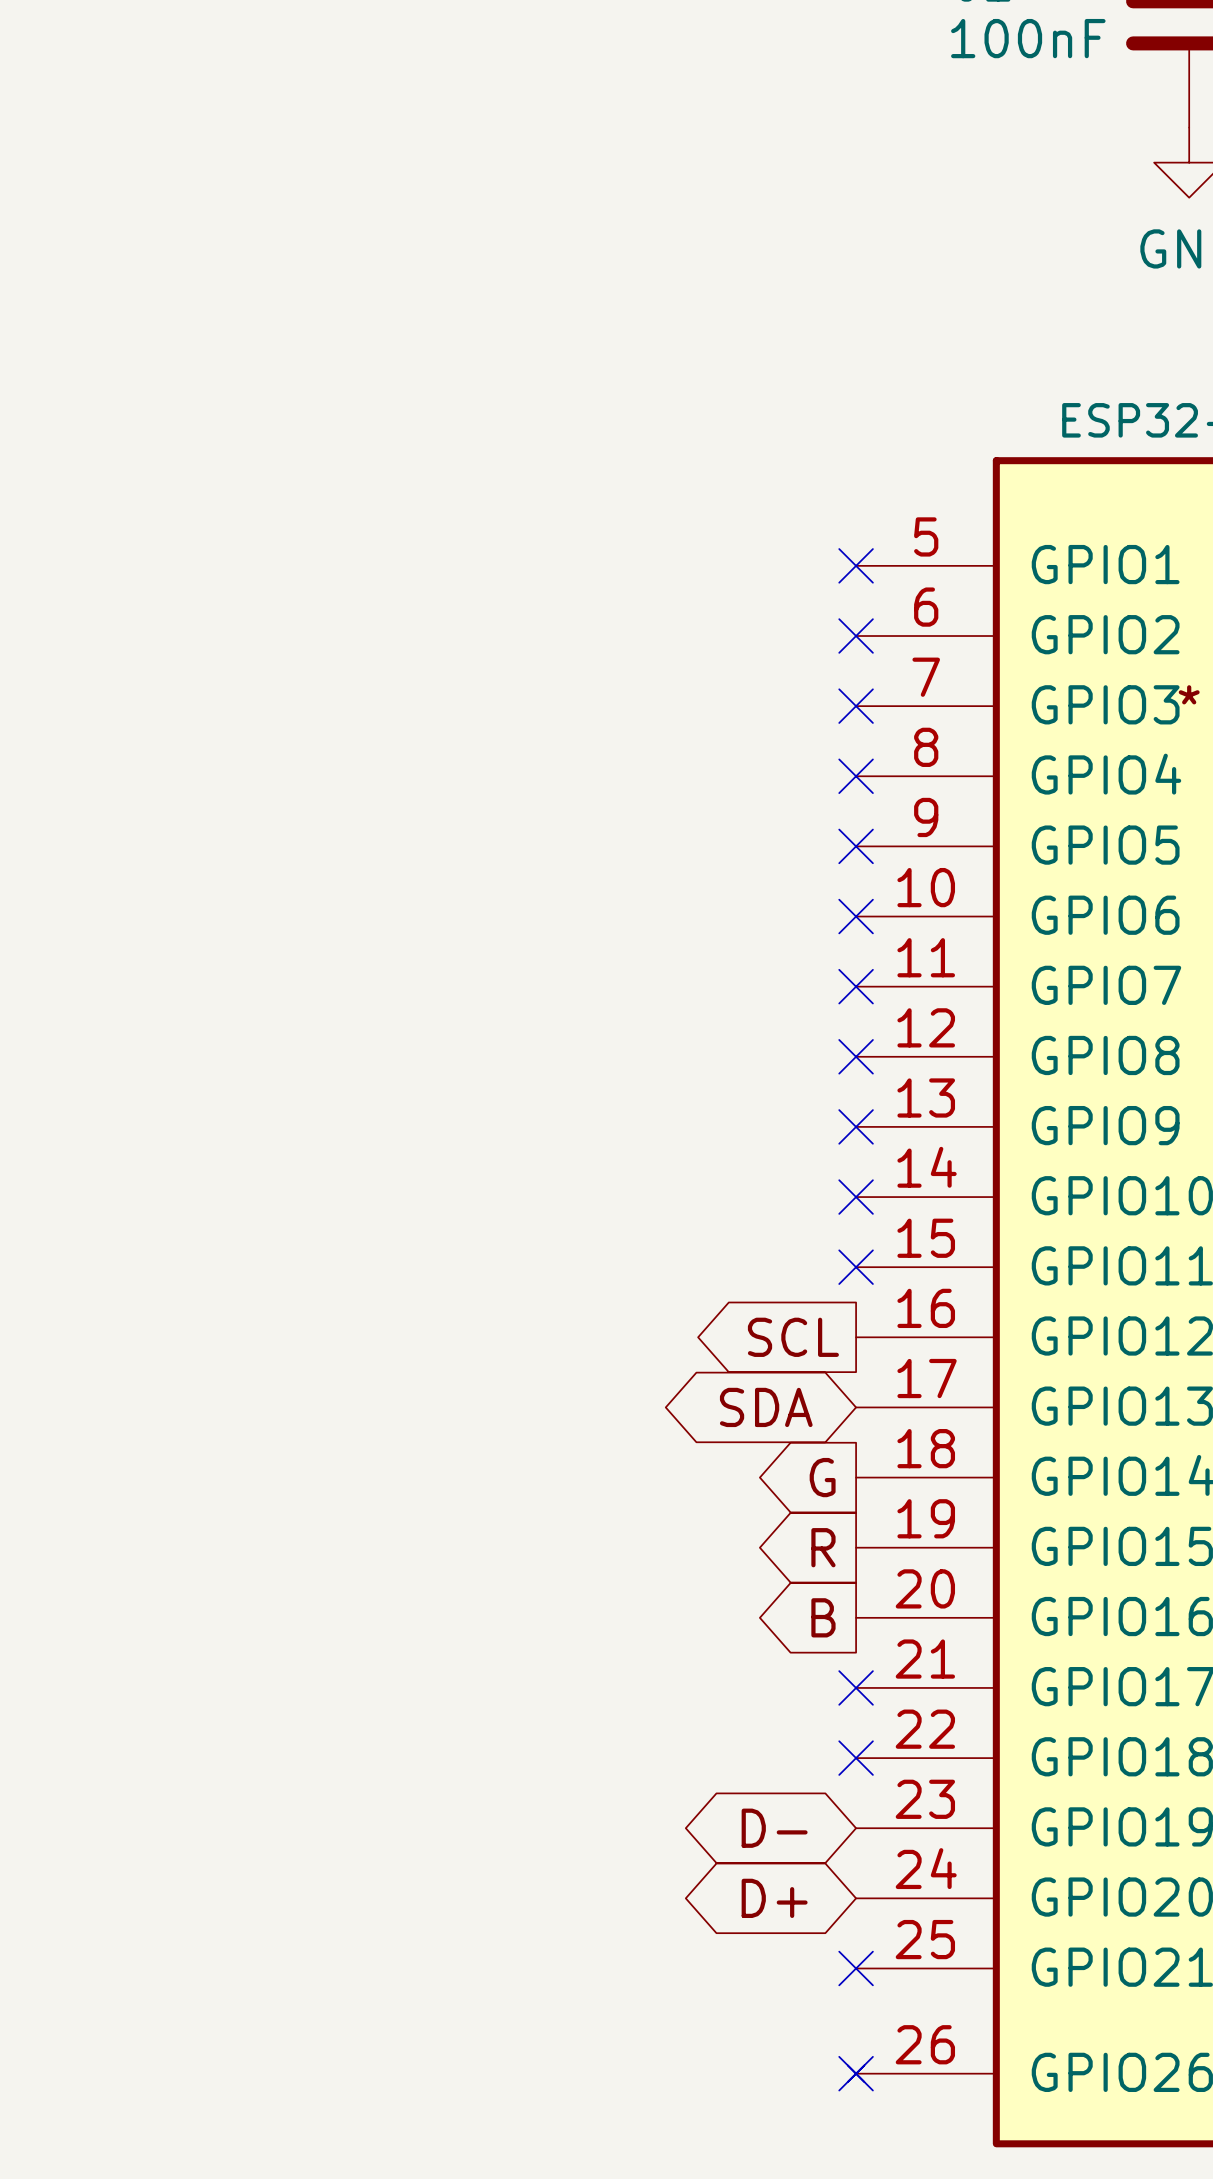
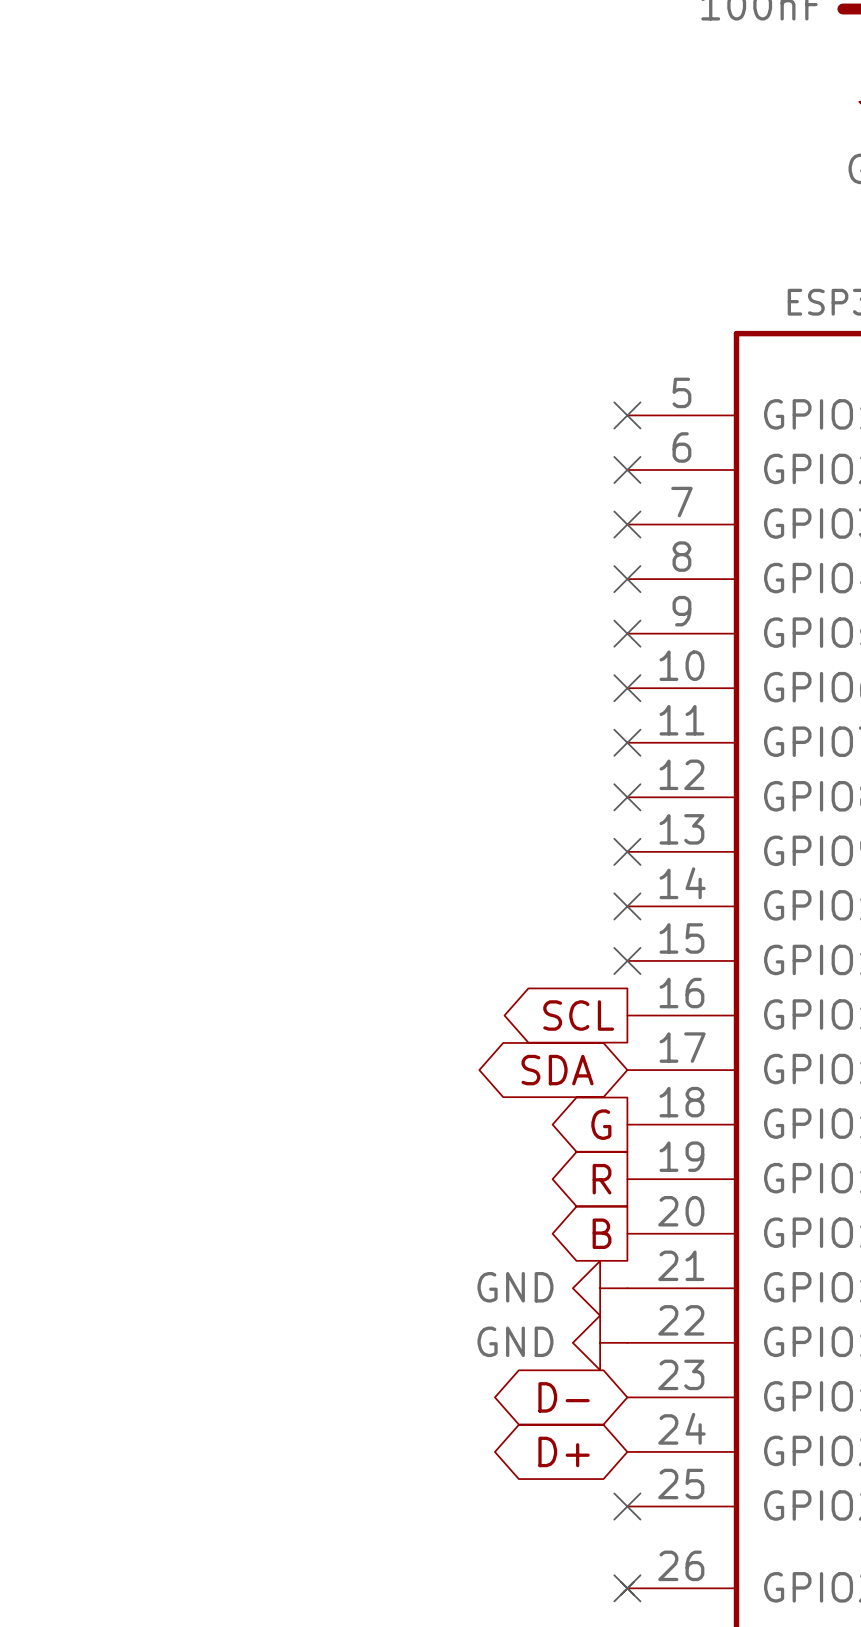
power symbol: none -> GND (600, 1288)
no-connect mark: (856, 1687) -> none
power symbol: none -> GND (600, 1342)
no-connect mark: (856, 1758) -> none

